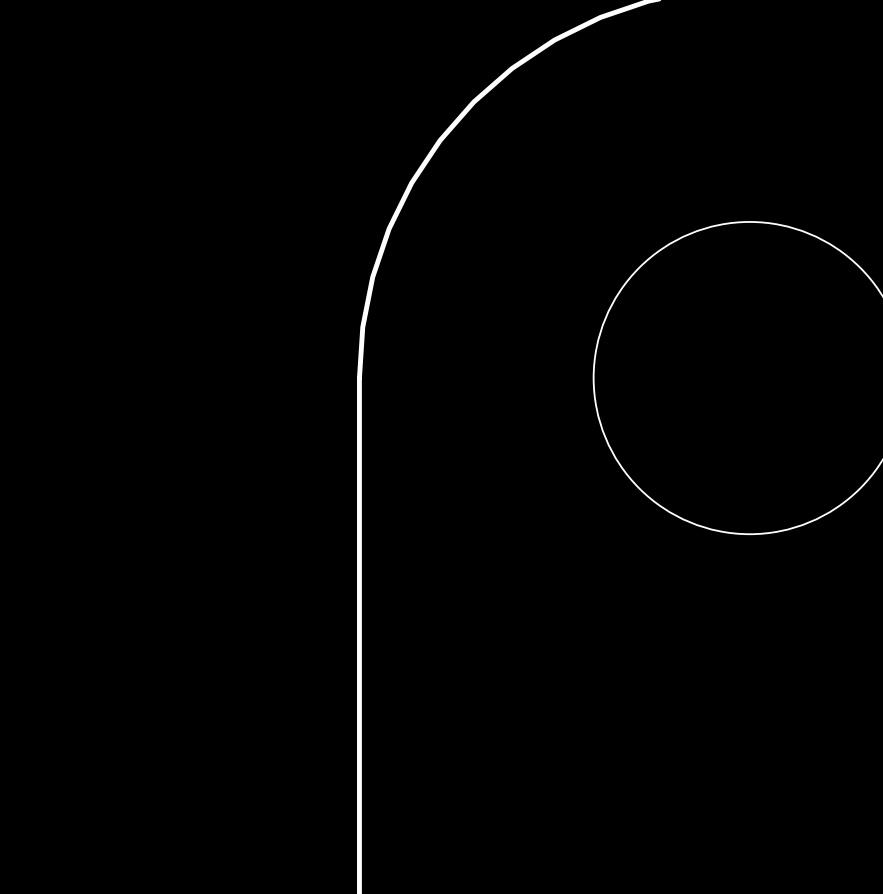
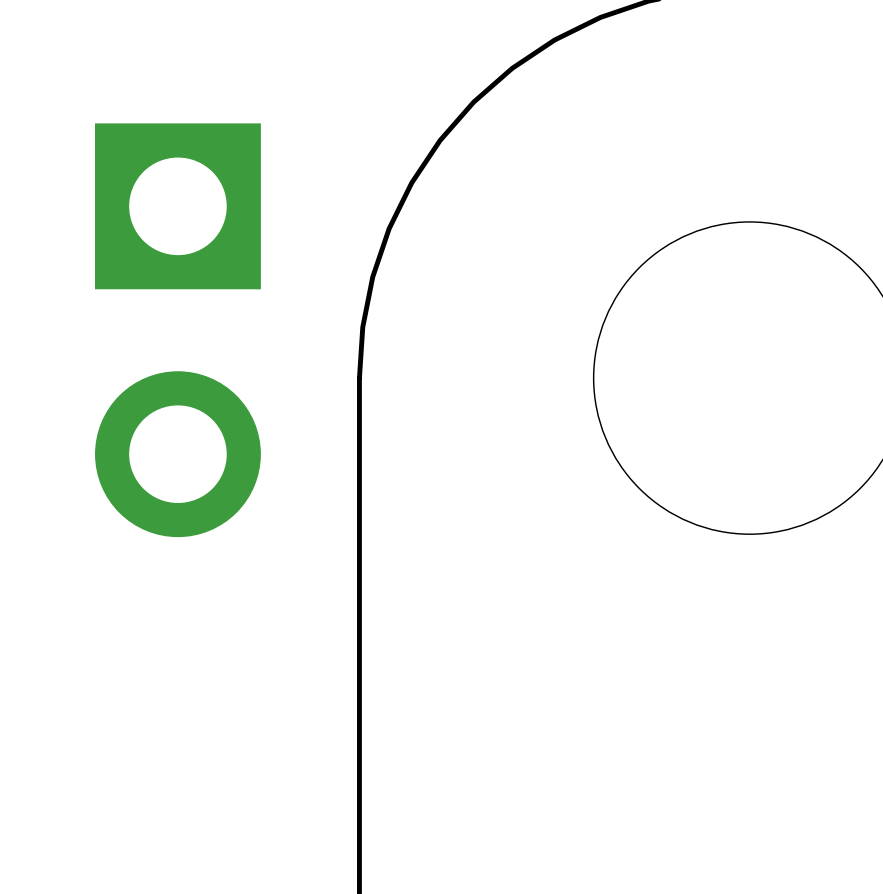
part: none -> (177, 330)

